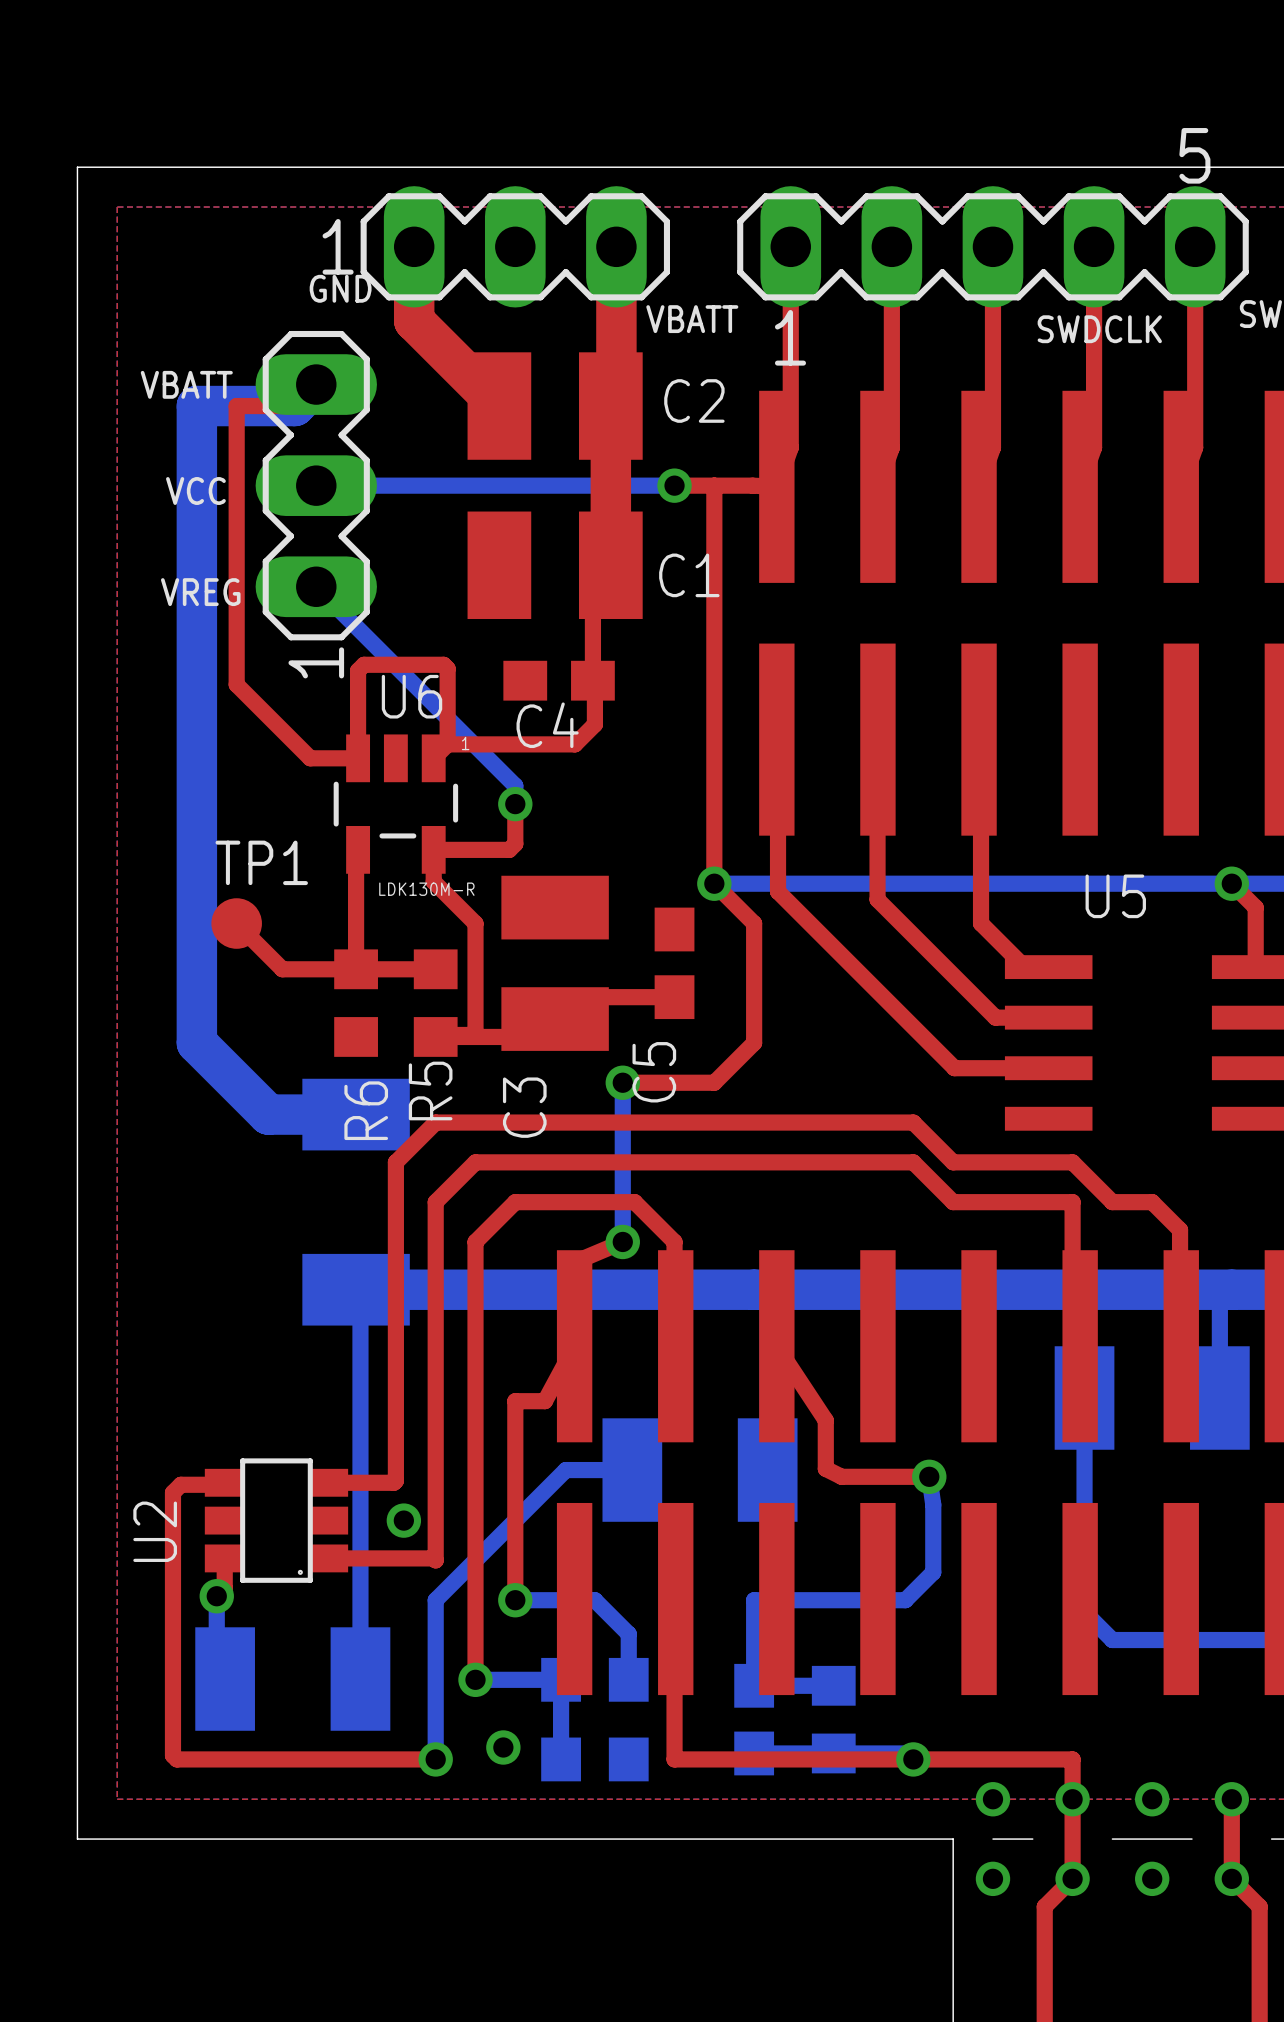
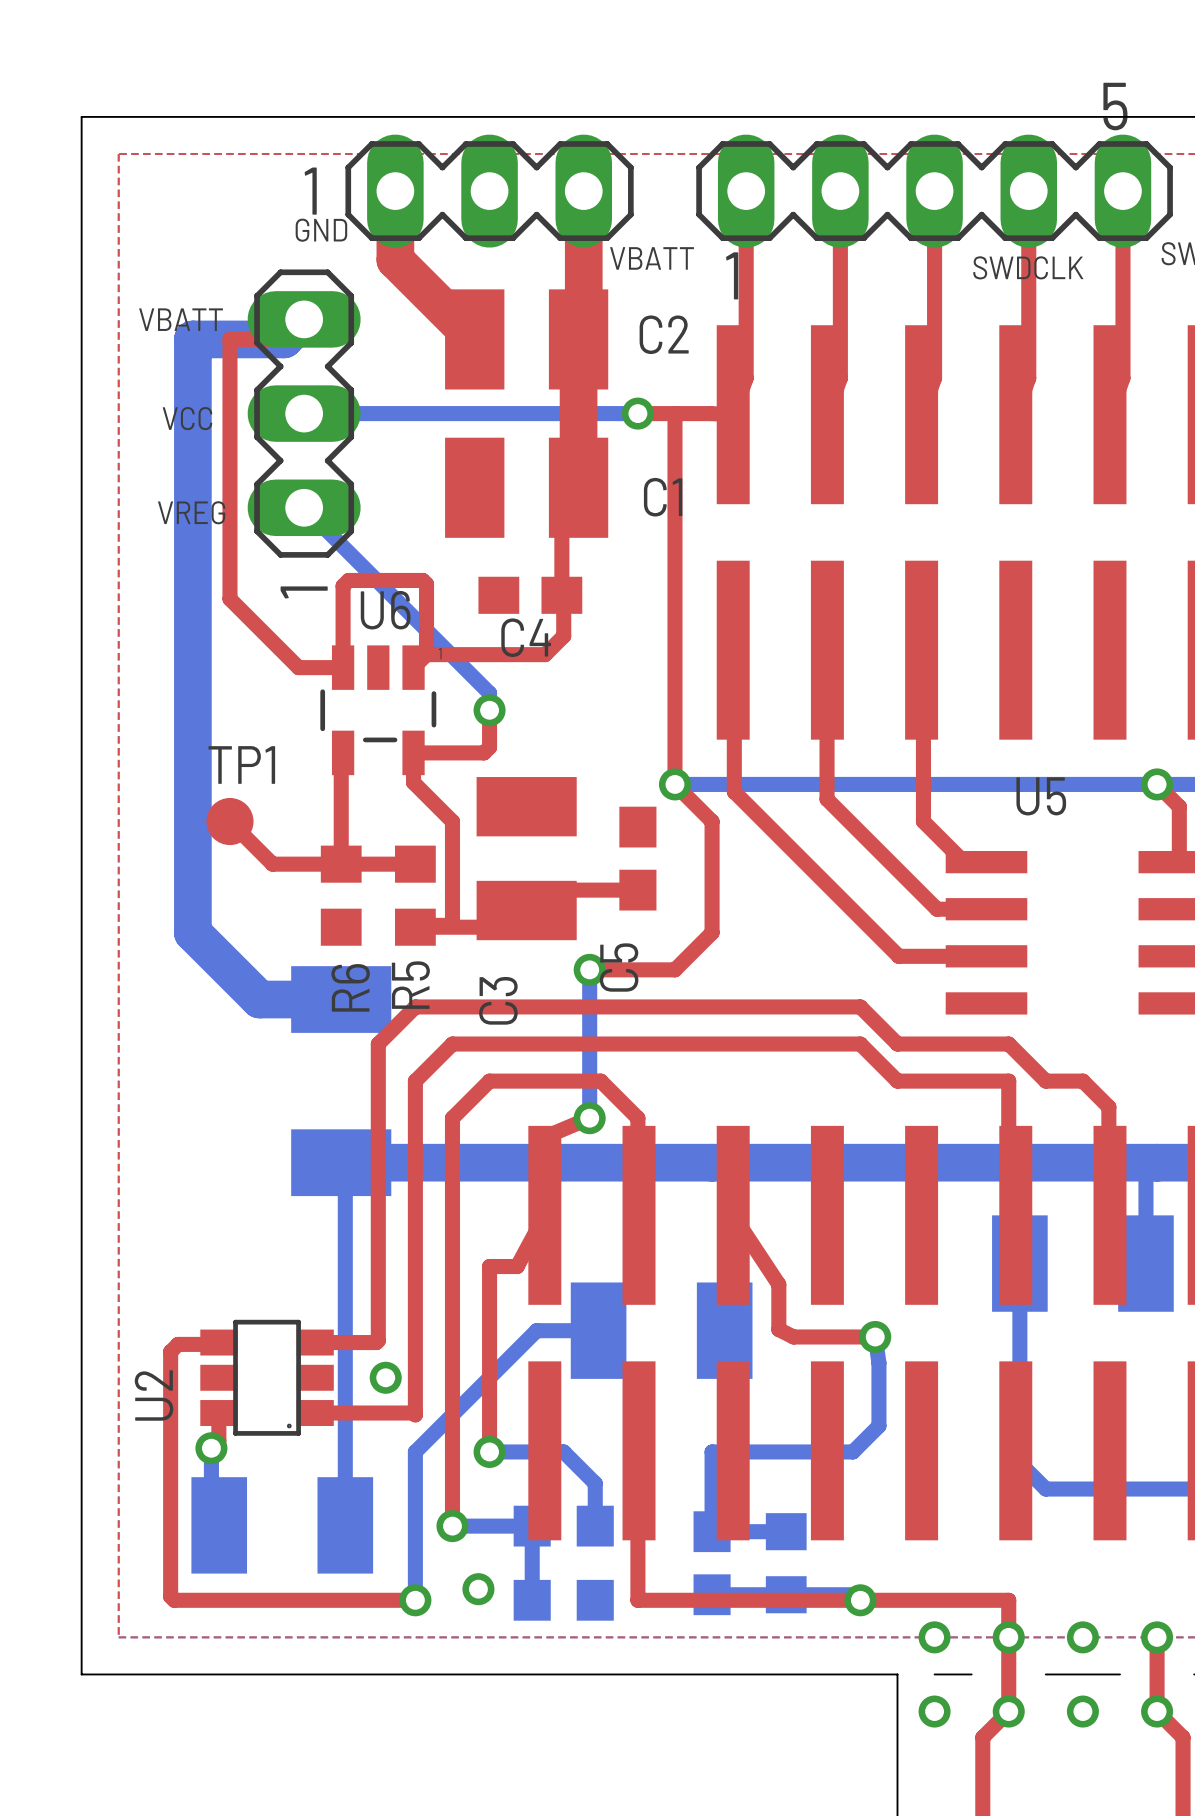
U6 value: LDK130M-R (426, 889) -> none

